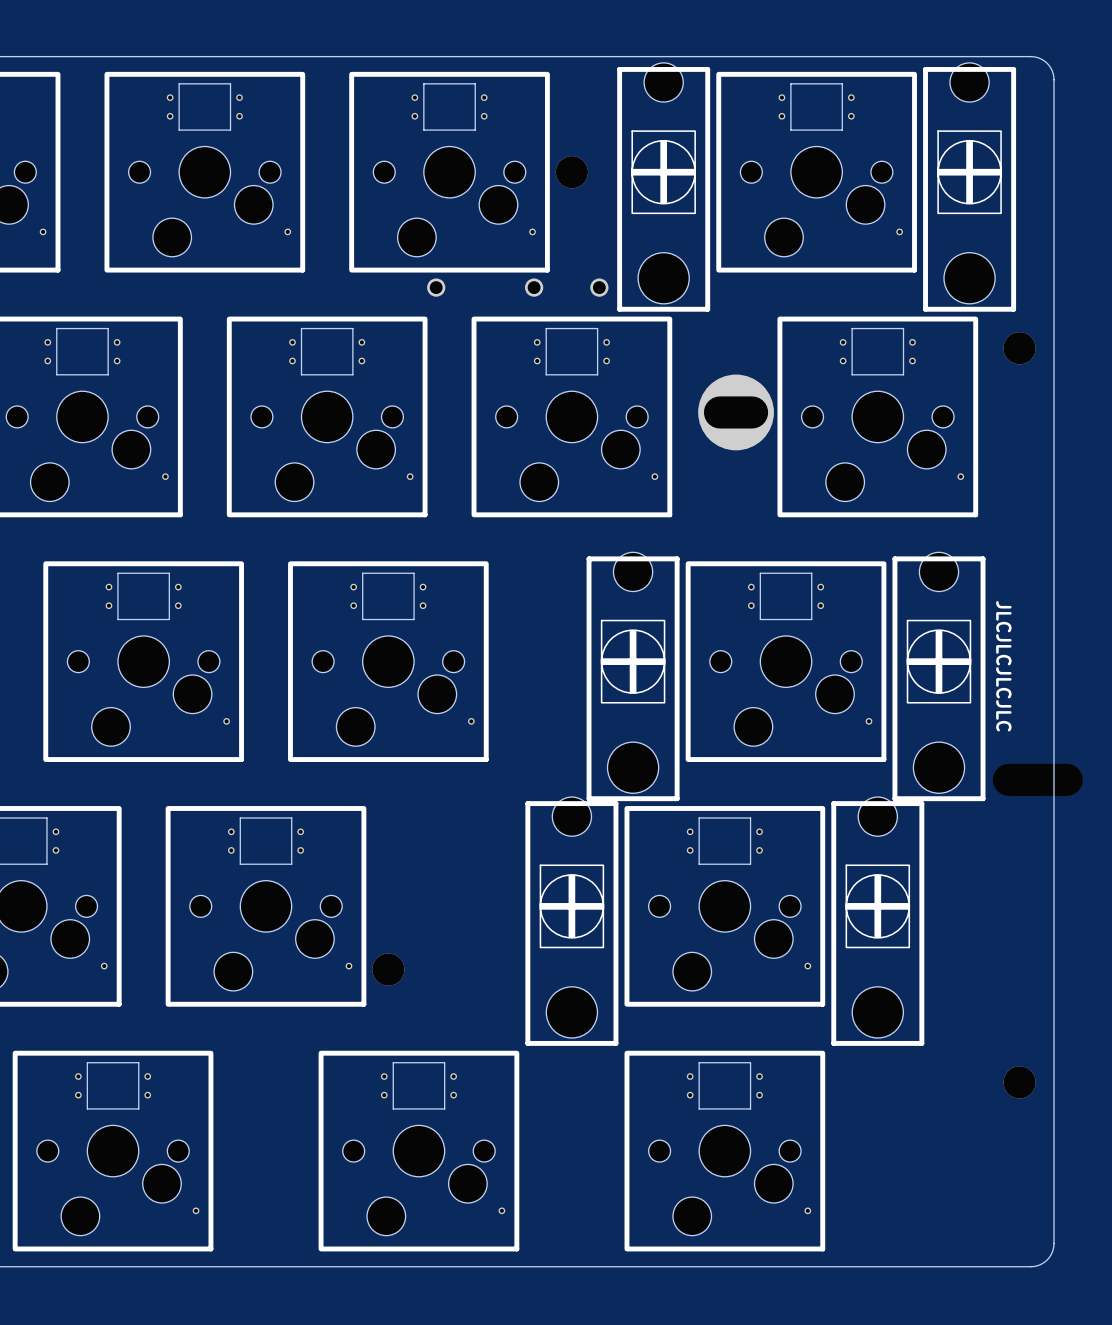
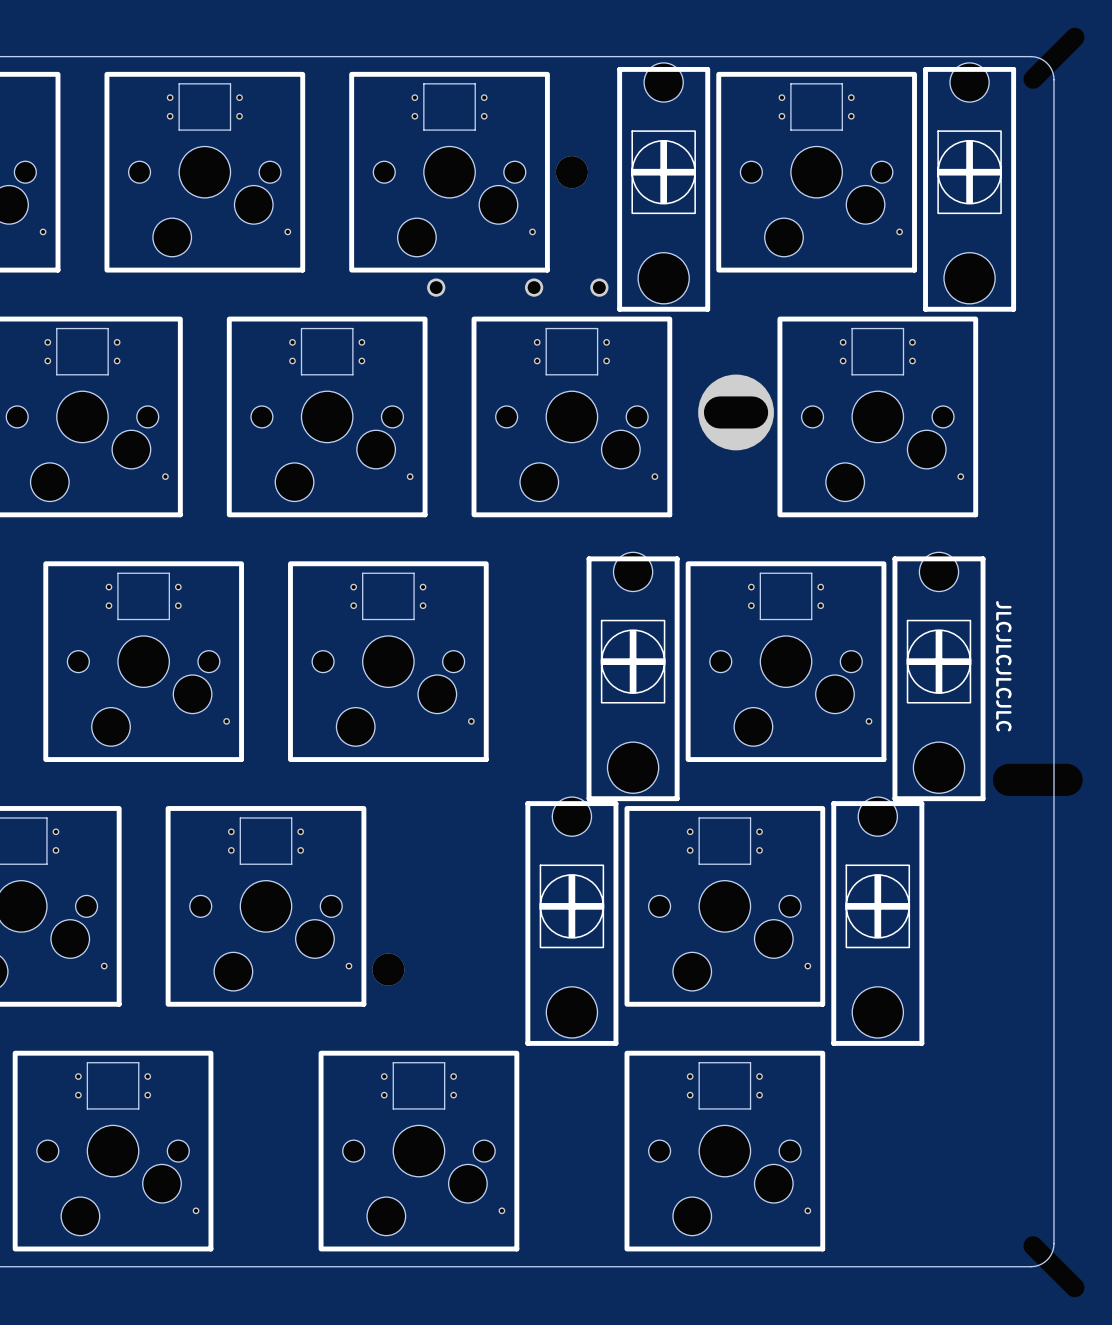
part: none -> (1053, 58)
part: (1019, 348) -> none
part: (1019, 1082) -> none
part: none -> (1053, 1266)

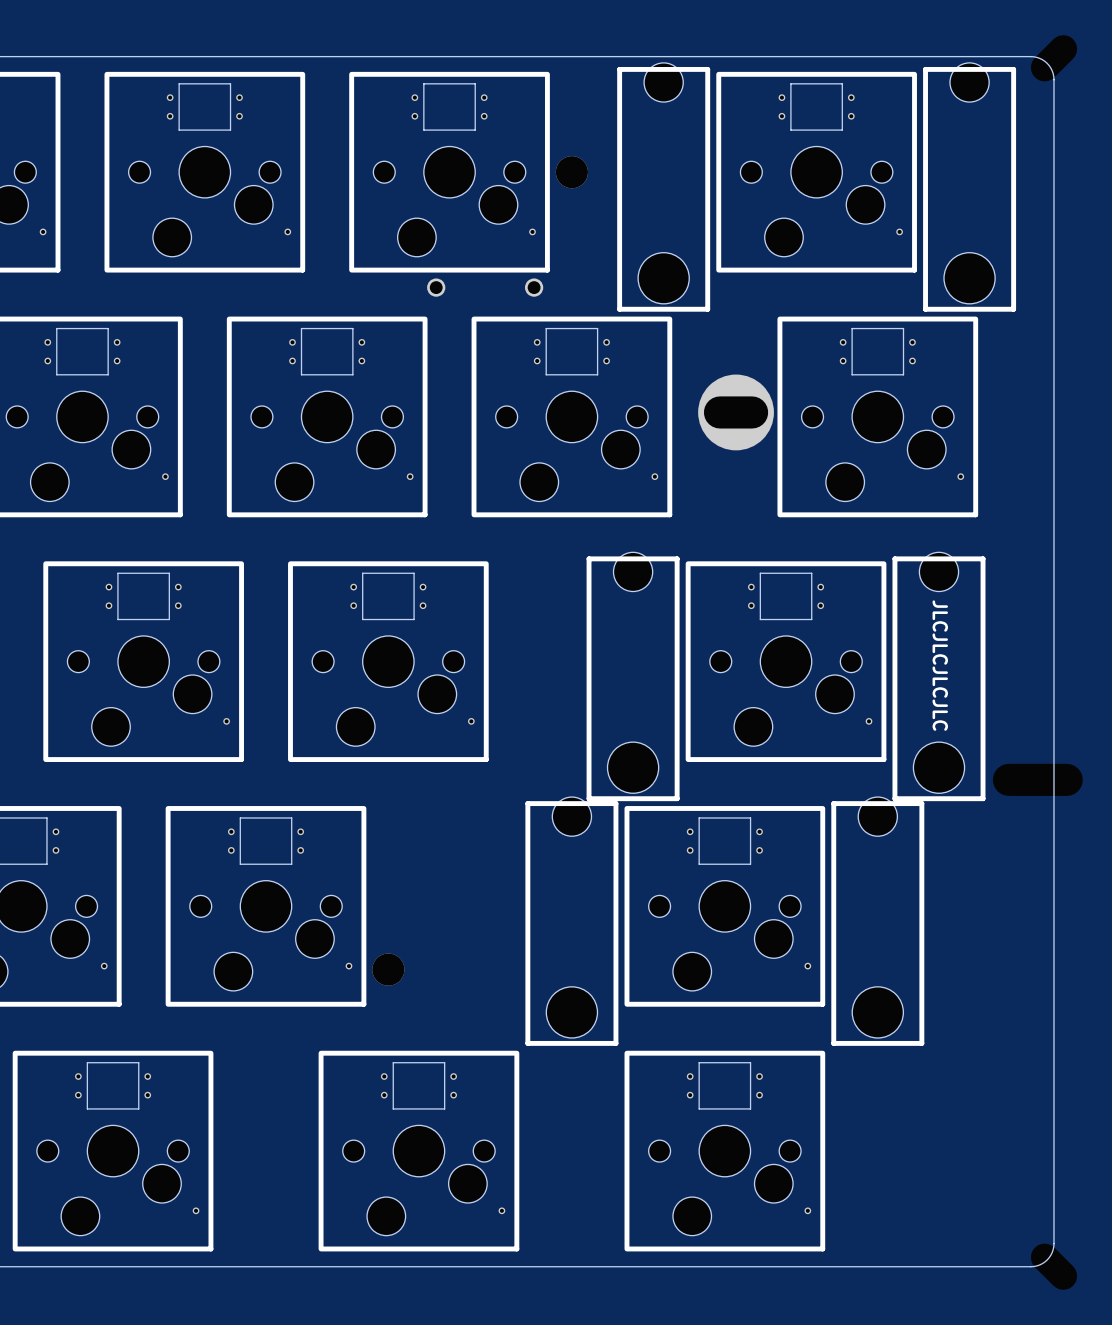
part footprint: [1023, 27, 1085, 89] -> [1030, 35, 1078, 82]
part footprint: [617, 62, 711, 312] -> [617, 62, 711, 312]
part footprint: [923, 62, 1017, 312] -> [923, 62, 1017, 312]
part: (599, 287) -> none
part footprint: [586, 552, 680, 802] -> [586, 552, 680, 802]
part footprint: [892, 552, 986, 802] -> [892, 552, 986, 802]
text position: JLCJLCJLCJLC (1003, 666) -> JLCJLCJLCJLC (940, 665)
part footprint: [525, 797, 619, 1046] -> [525, 797, 619, 1046]
part footprint: [831, 797, 925, 1046] -> [831, 797, 925, 1046]
part footprint: [1023, 1236, 1085, 1298] -> [1030, 1243, 1078, 1290]

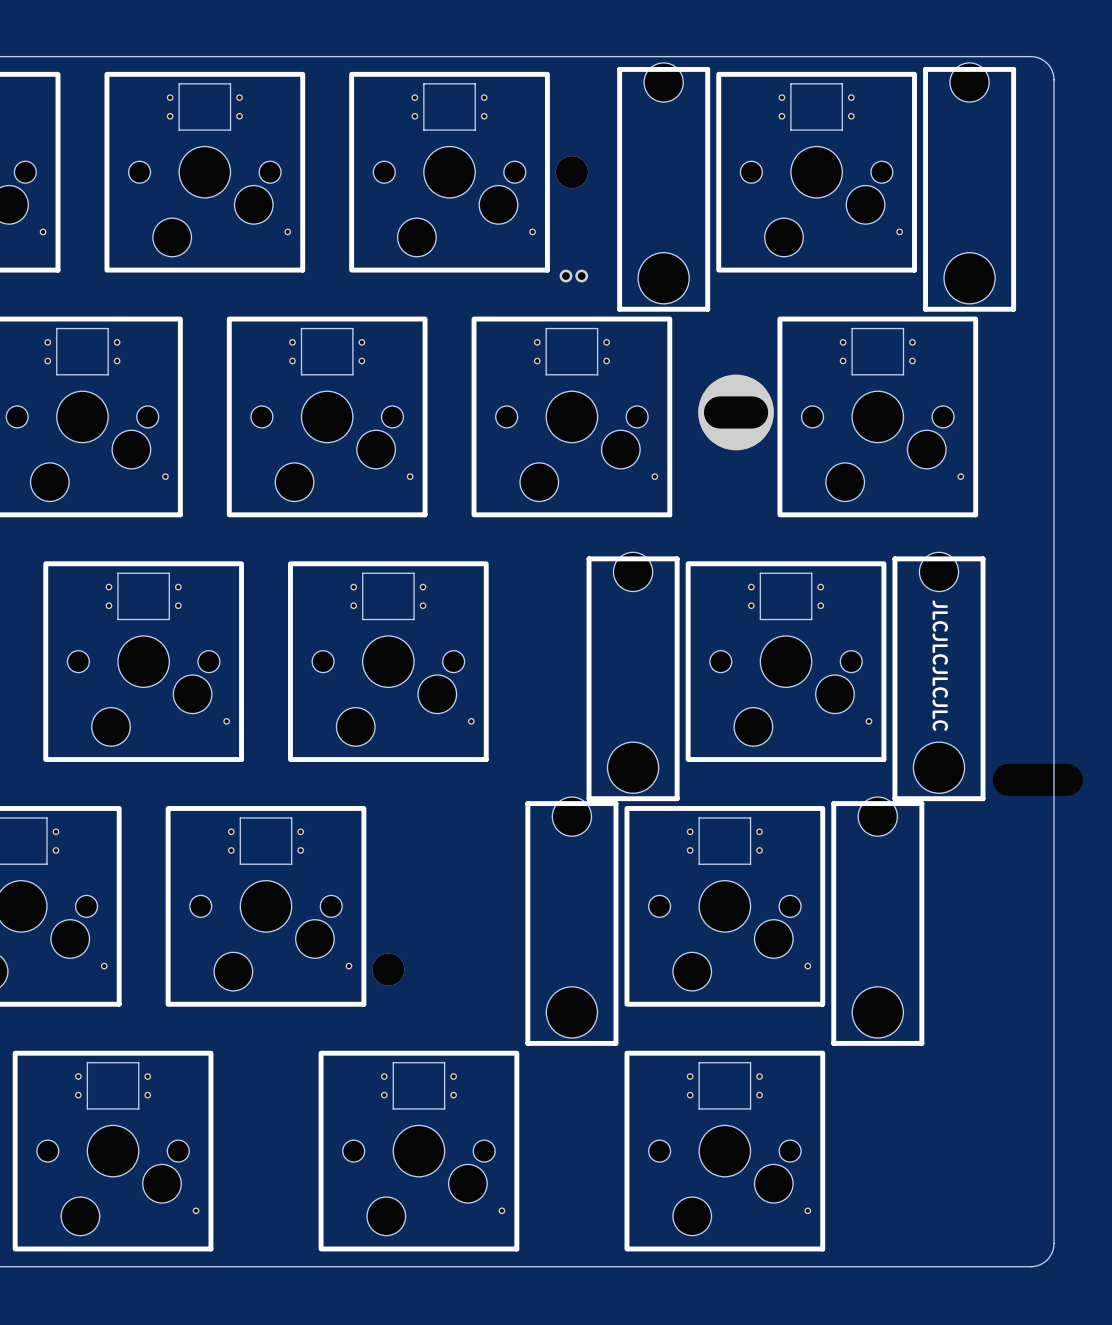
part: (1053, 58) -> none
part: none -> (565, 276)
part: none -> (581, 276)
part: (436, 287) -> none
part: (534, 287) -> none
part: (1053, 1266) -> none

